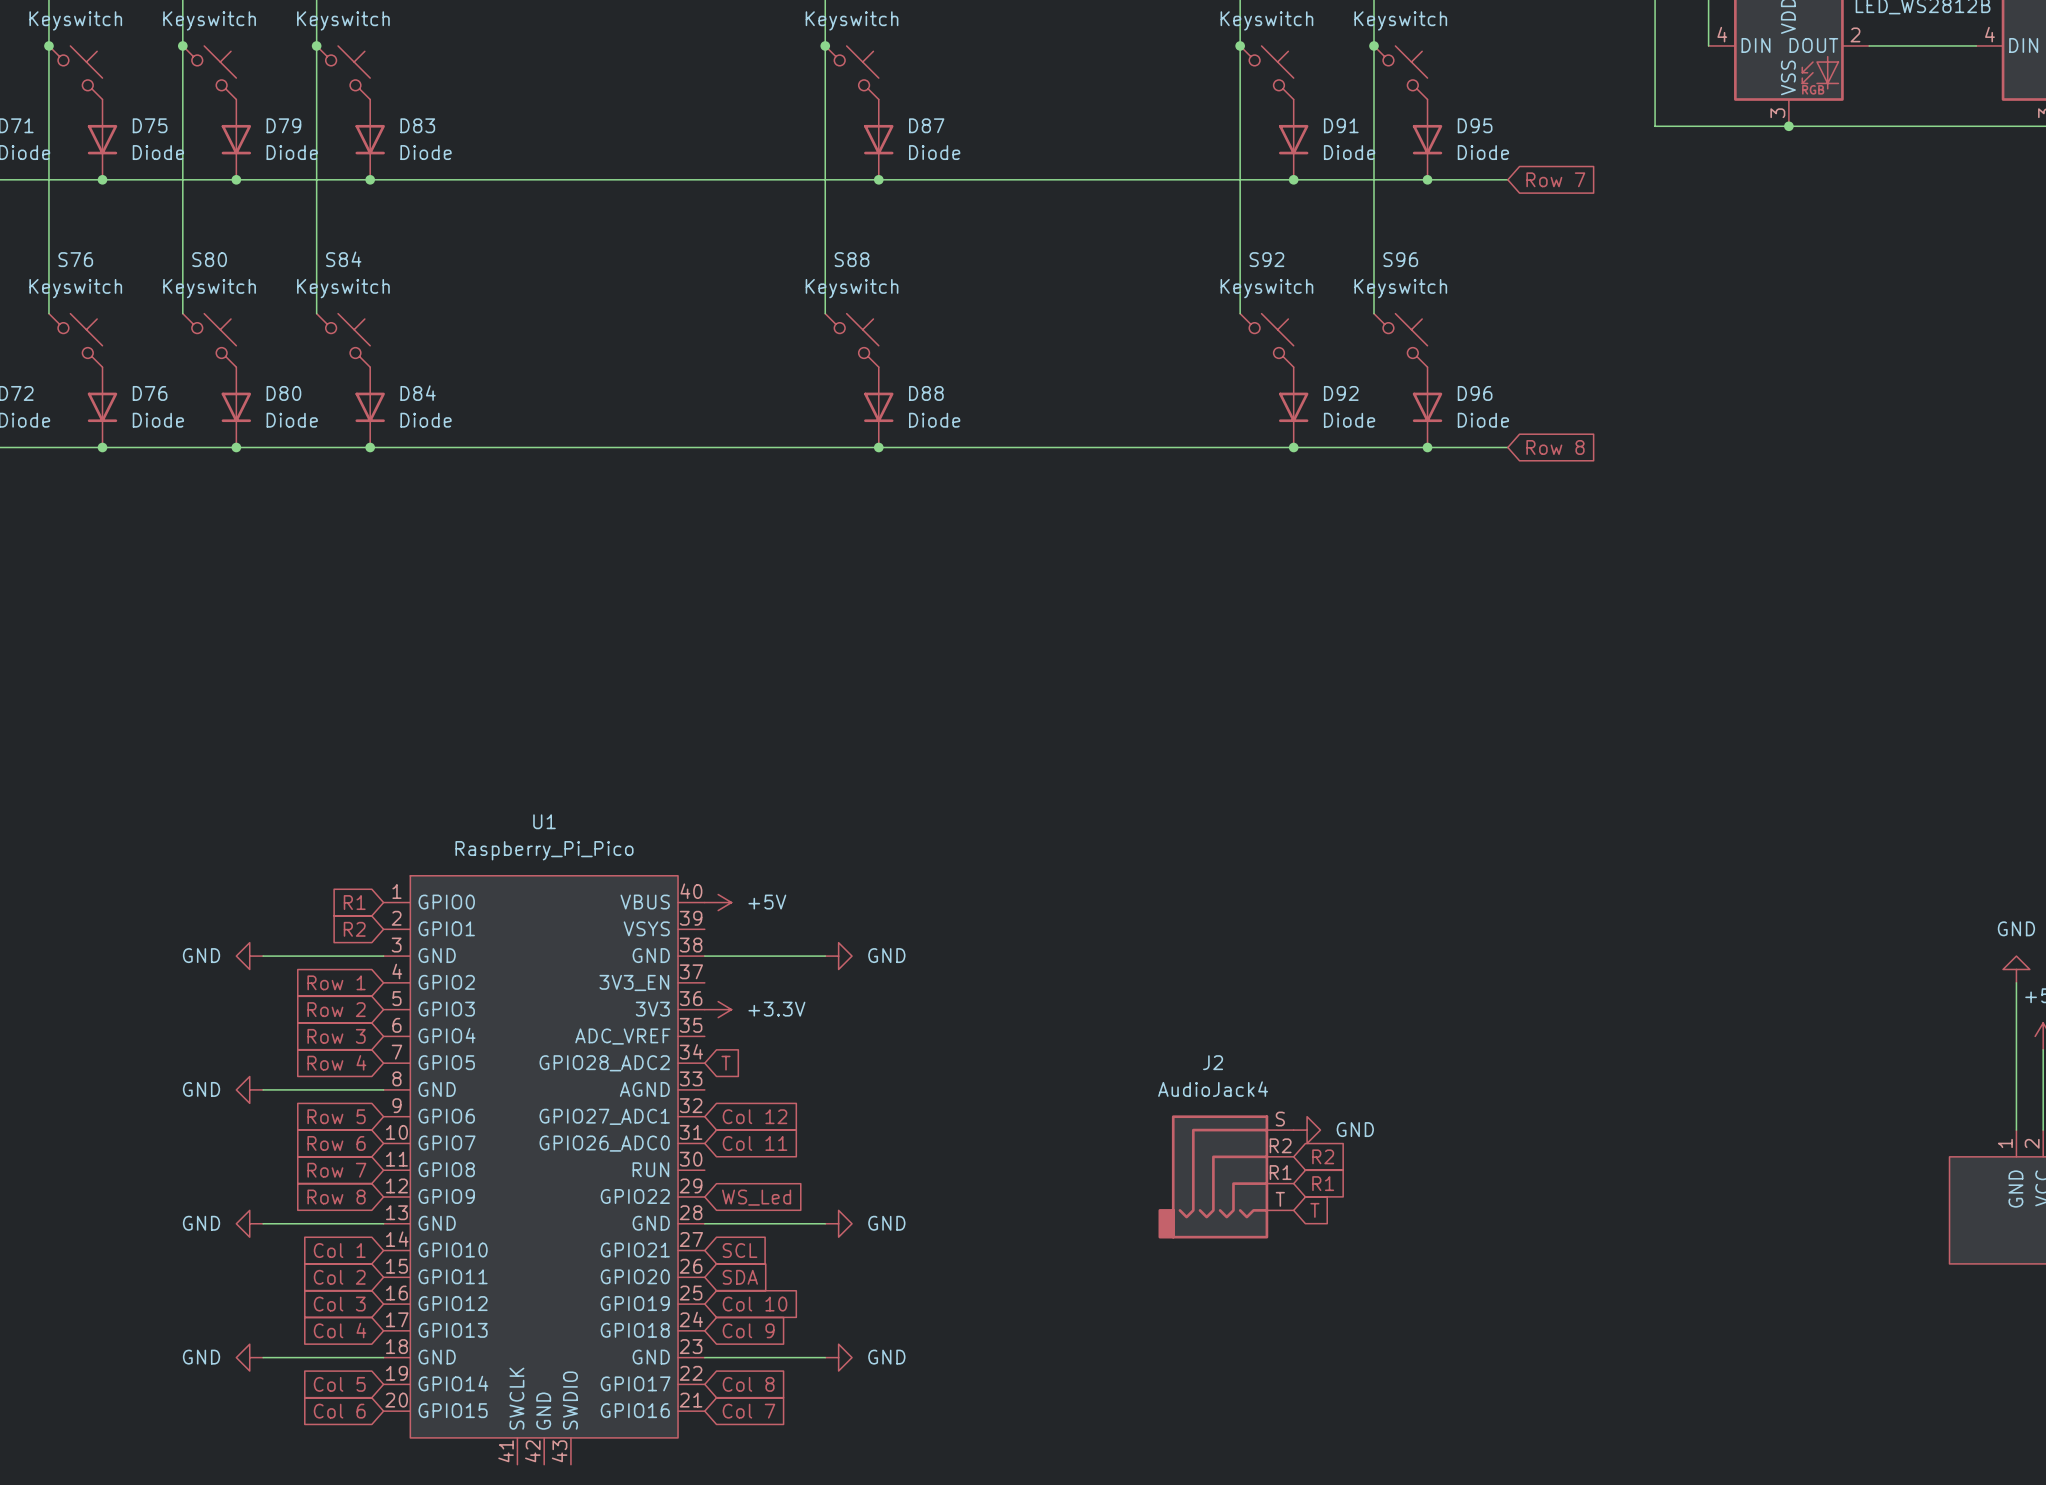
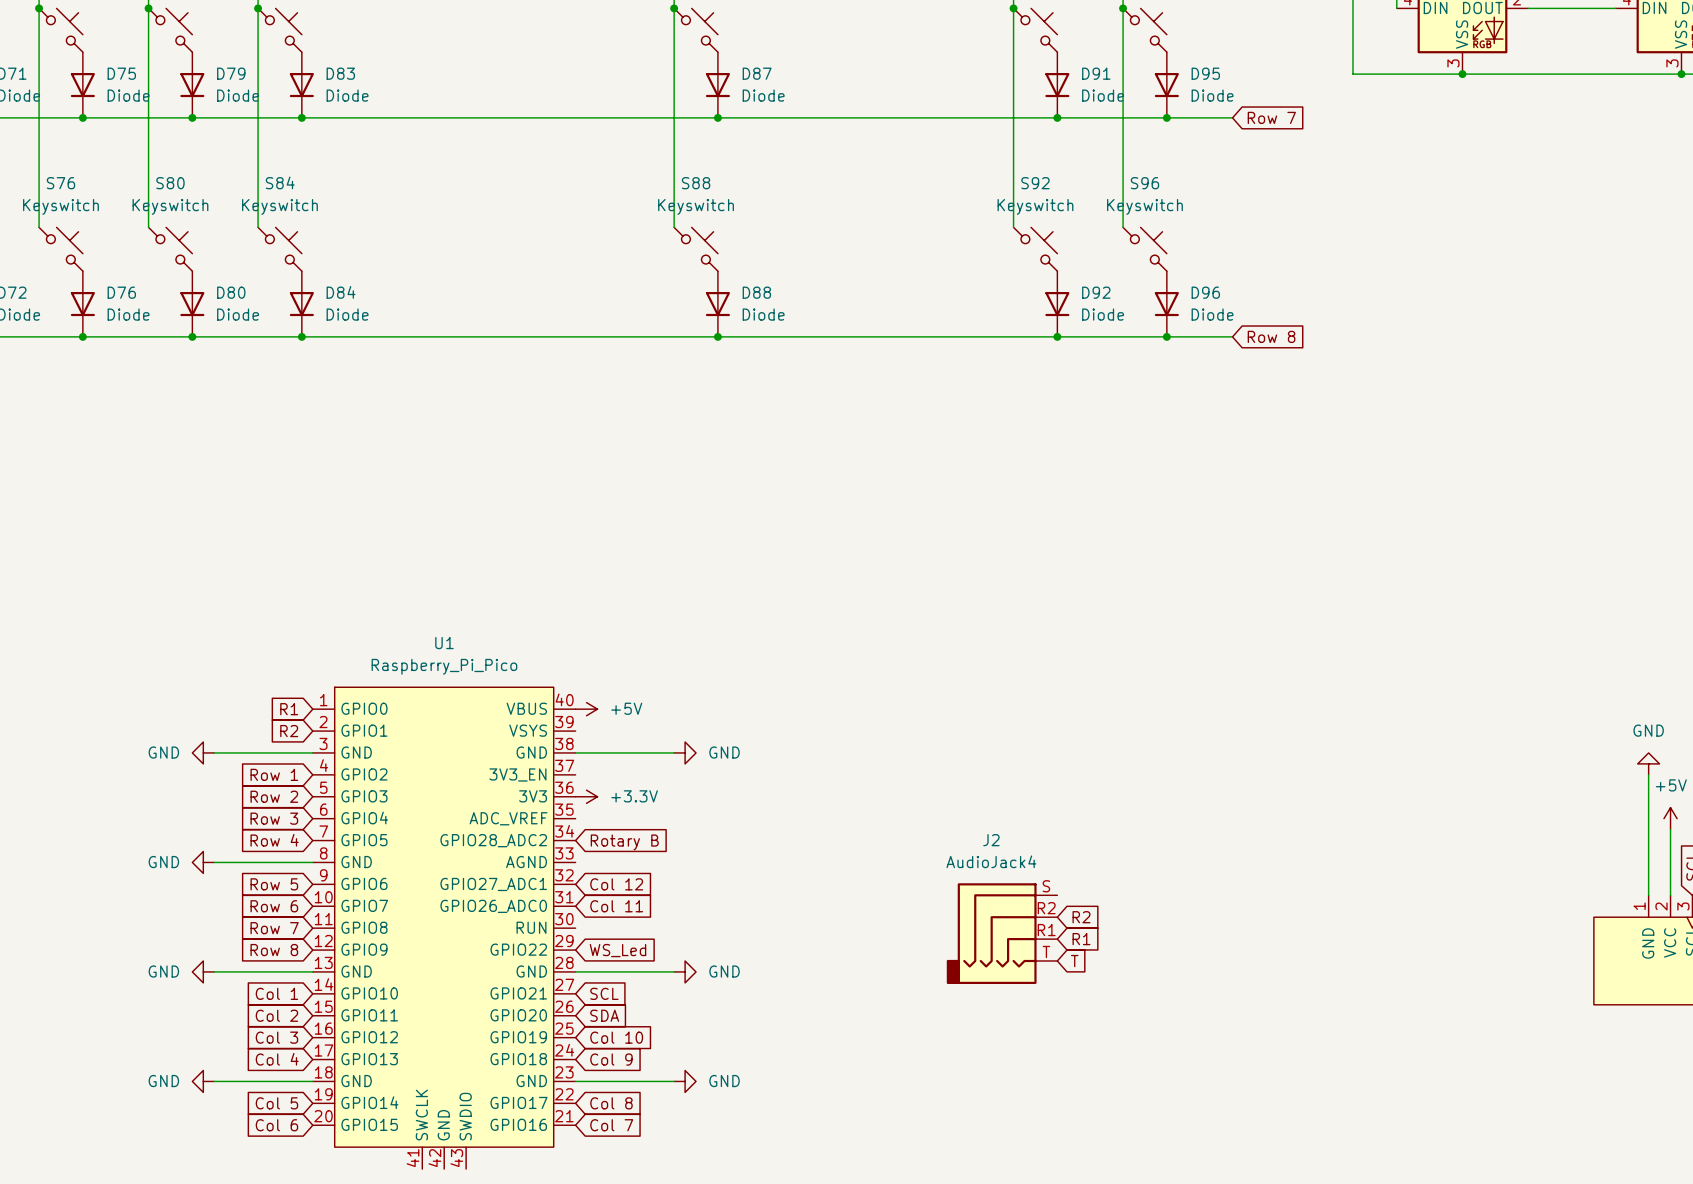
global label: T (726, 1063) -> Rotary B (624, 842)
power symbol: GND (1307, 1130) -> none

